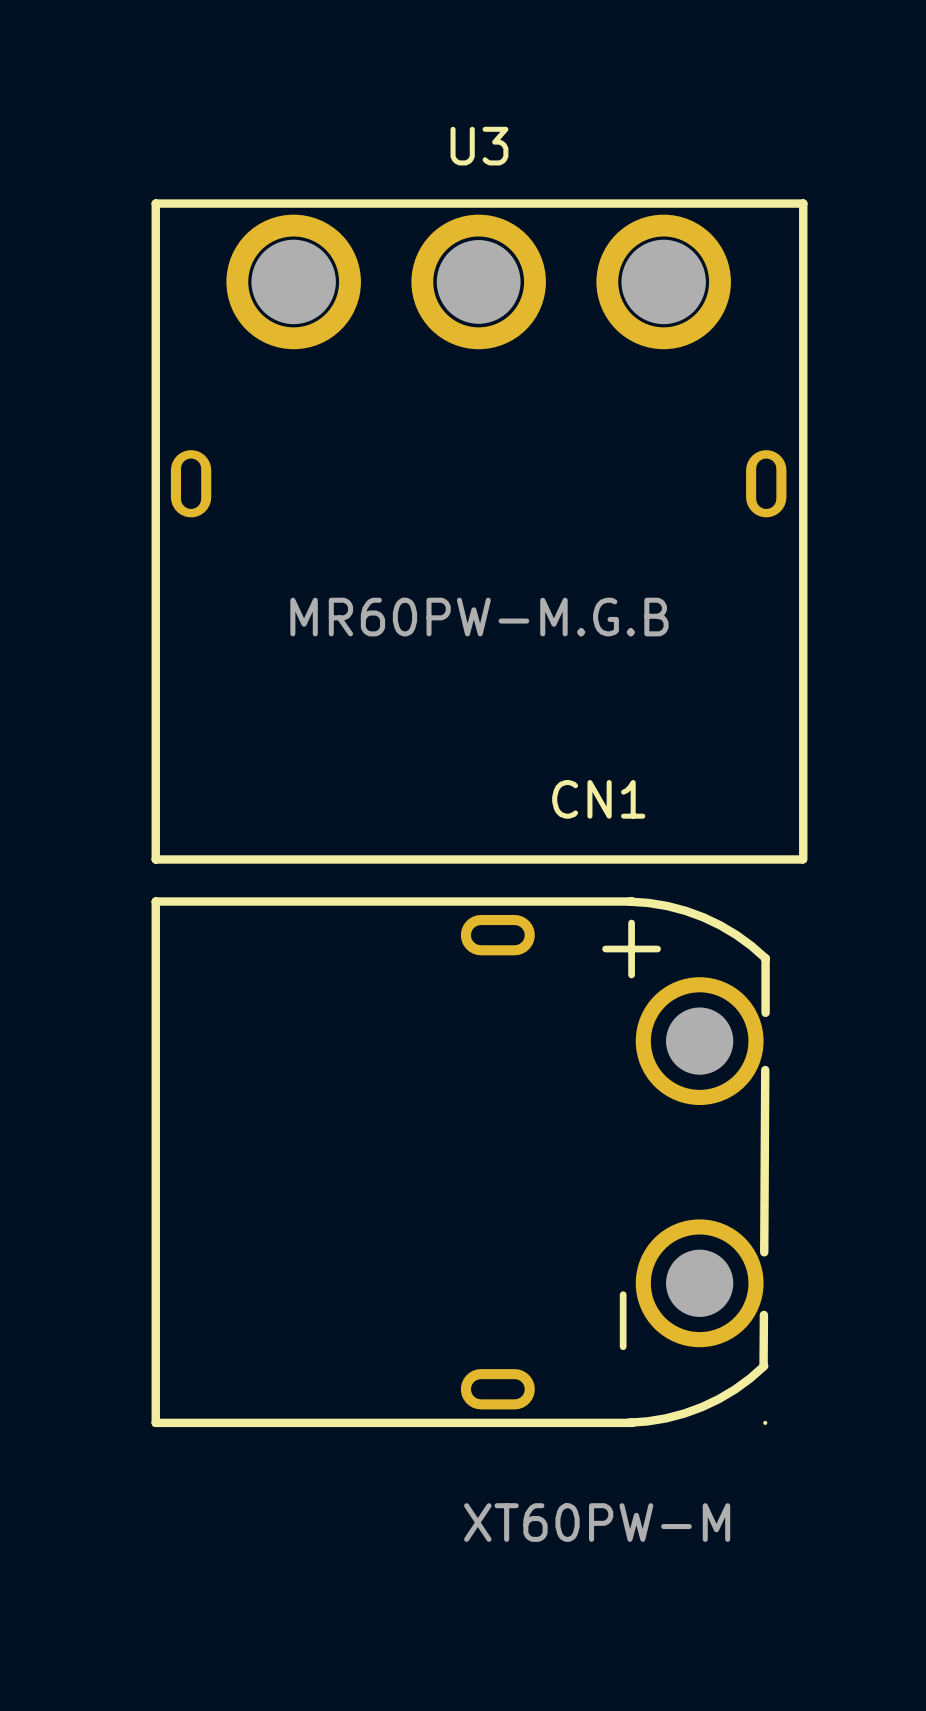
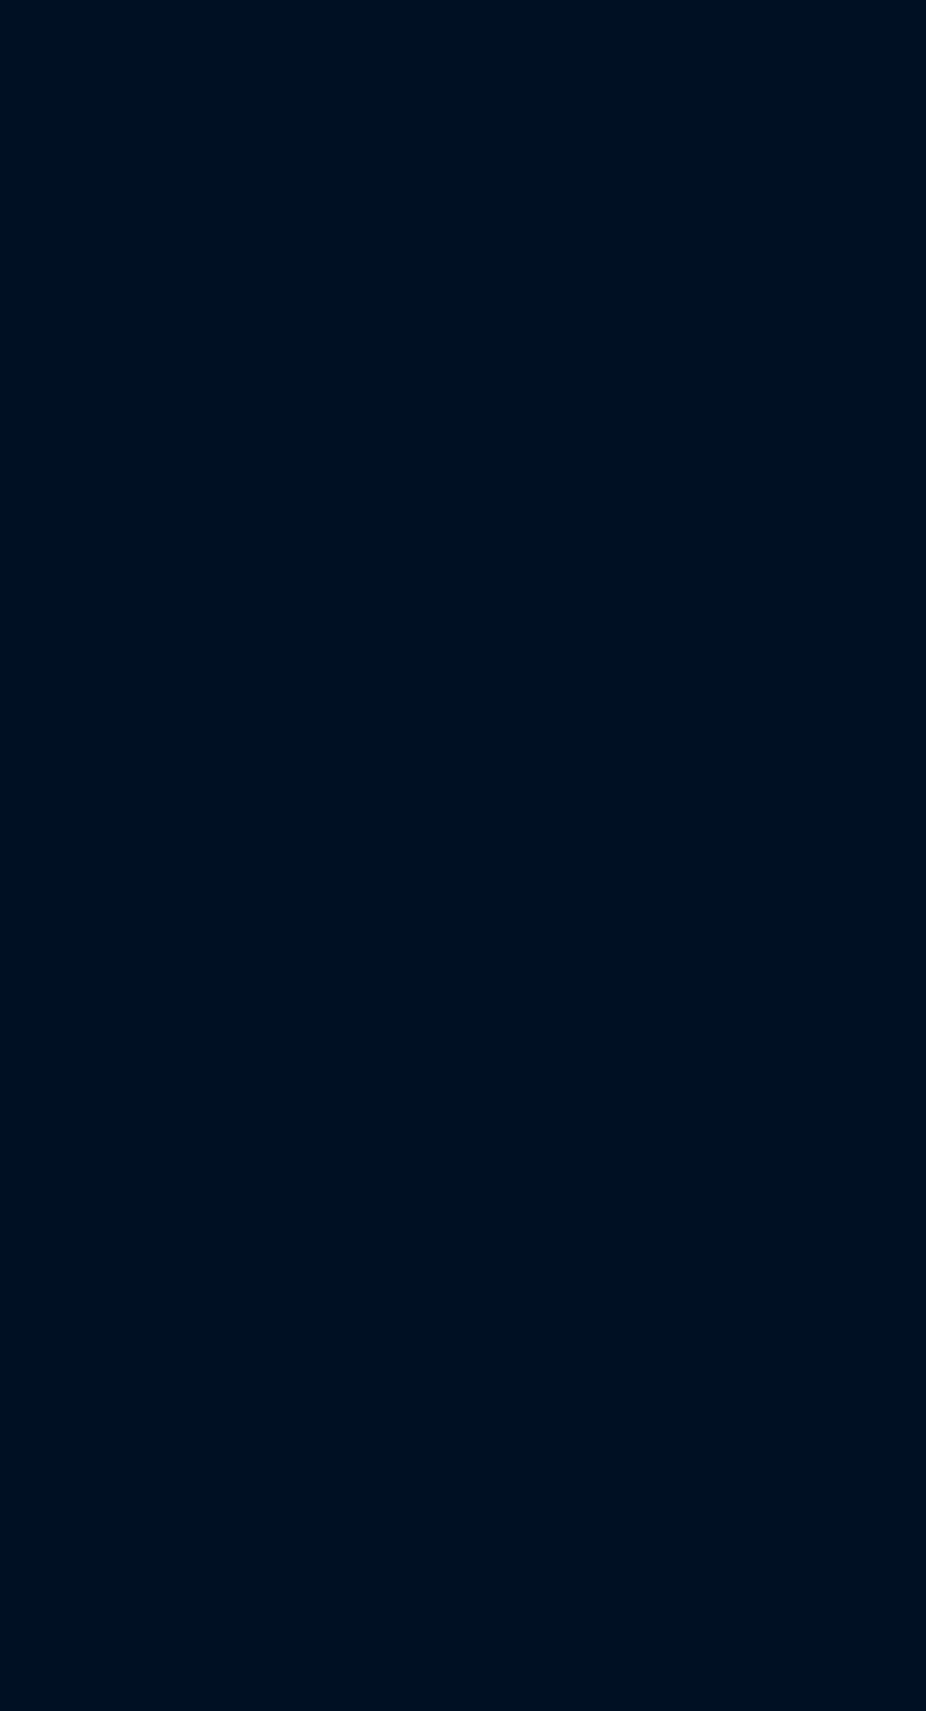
U3: MR60PW-M.G.B (479, 531) -> none
CN1: XT60PW-M (460, 1162) -> none

